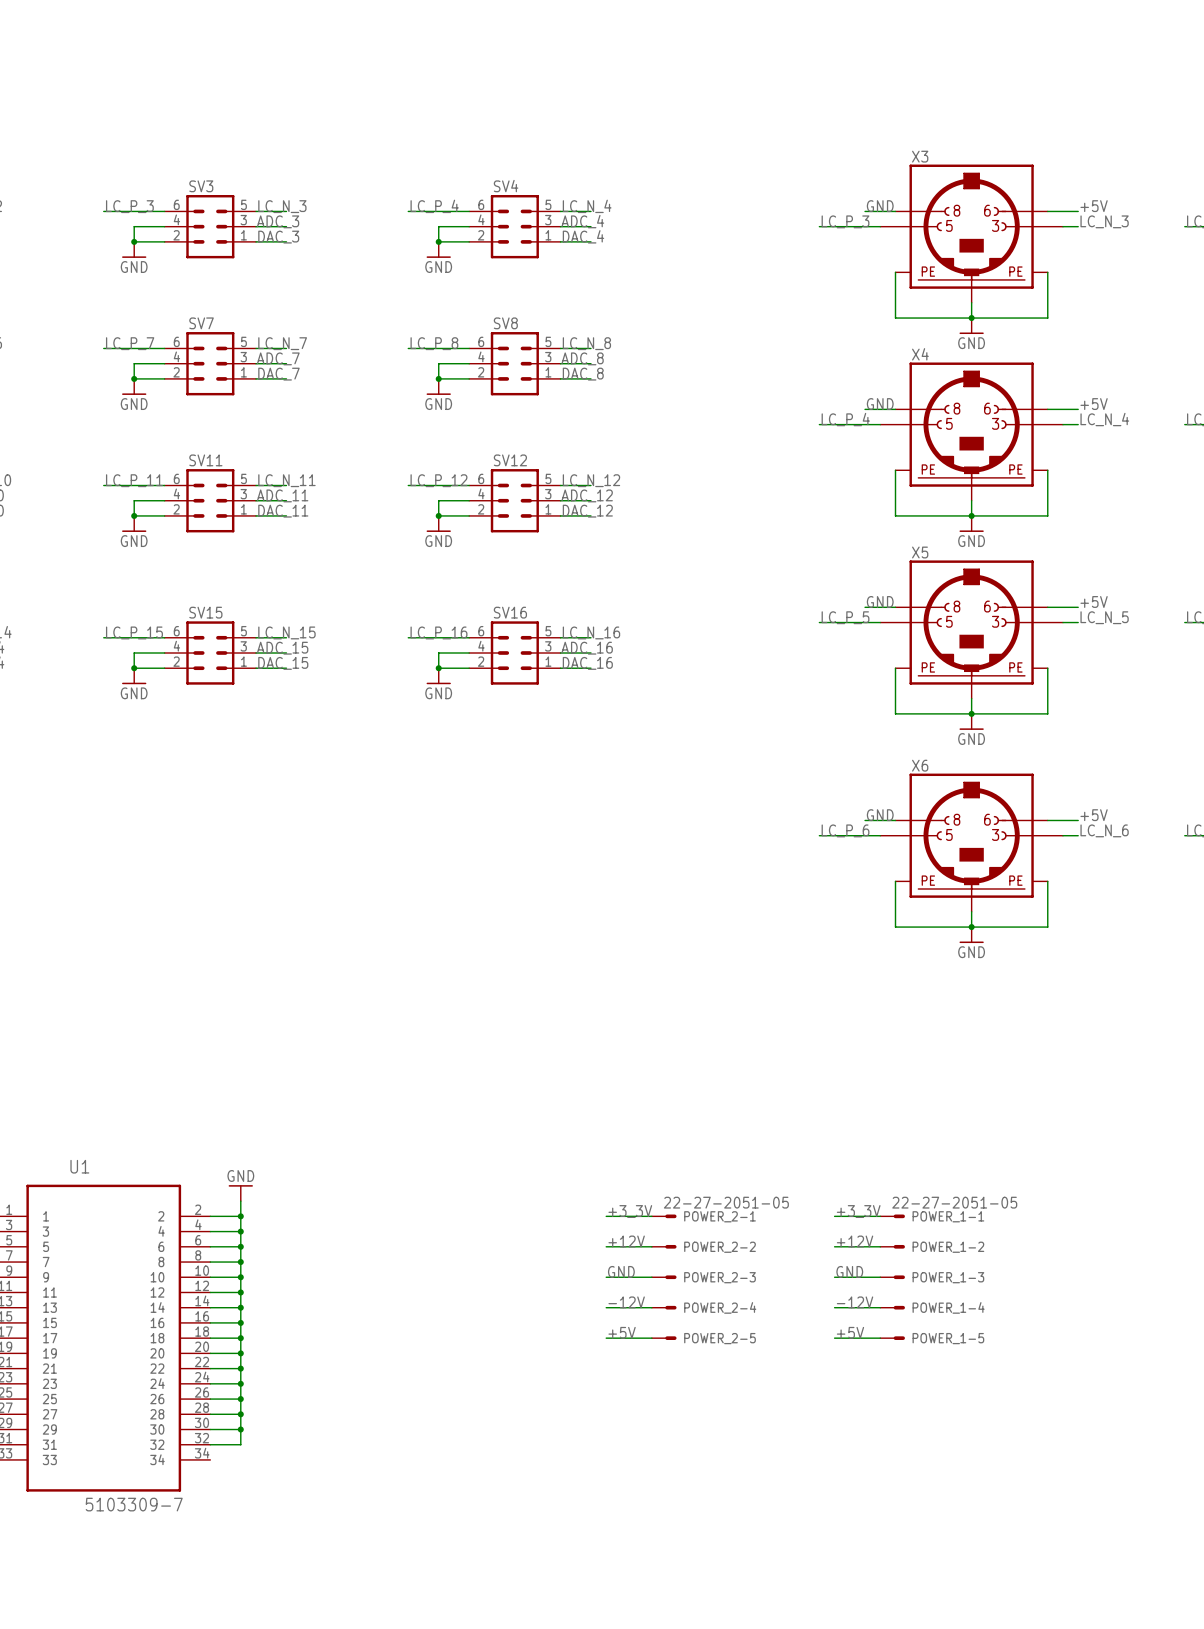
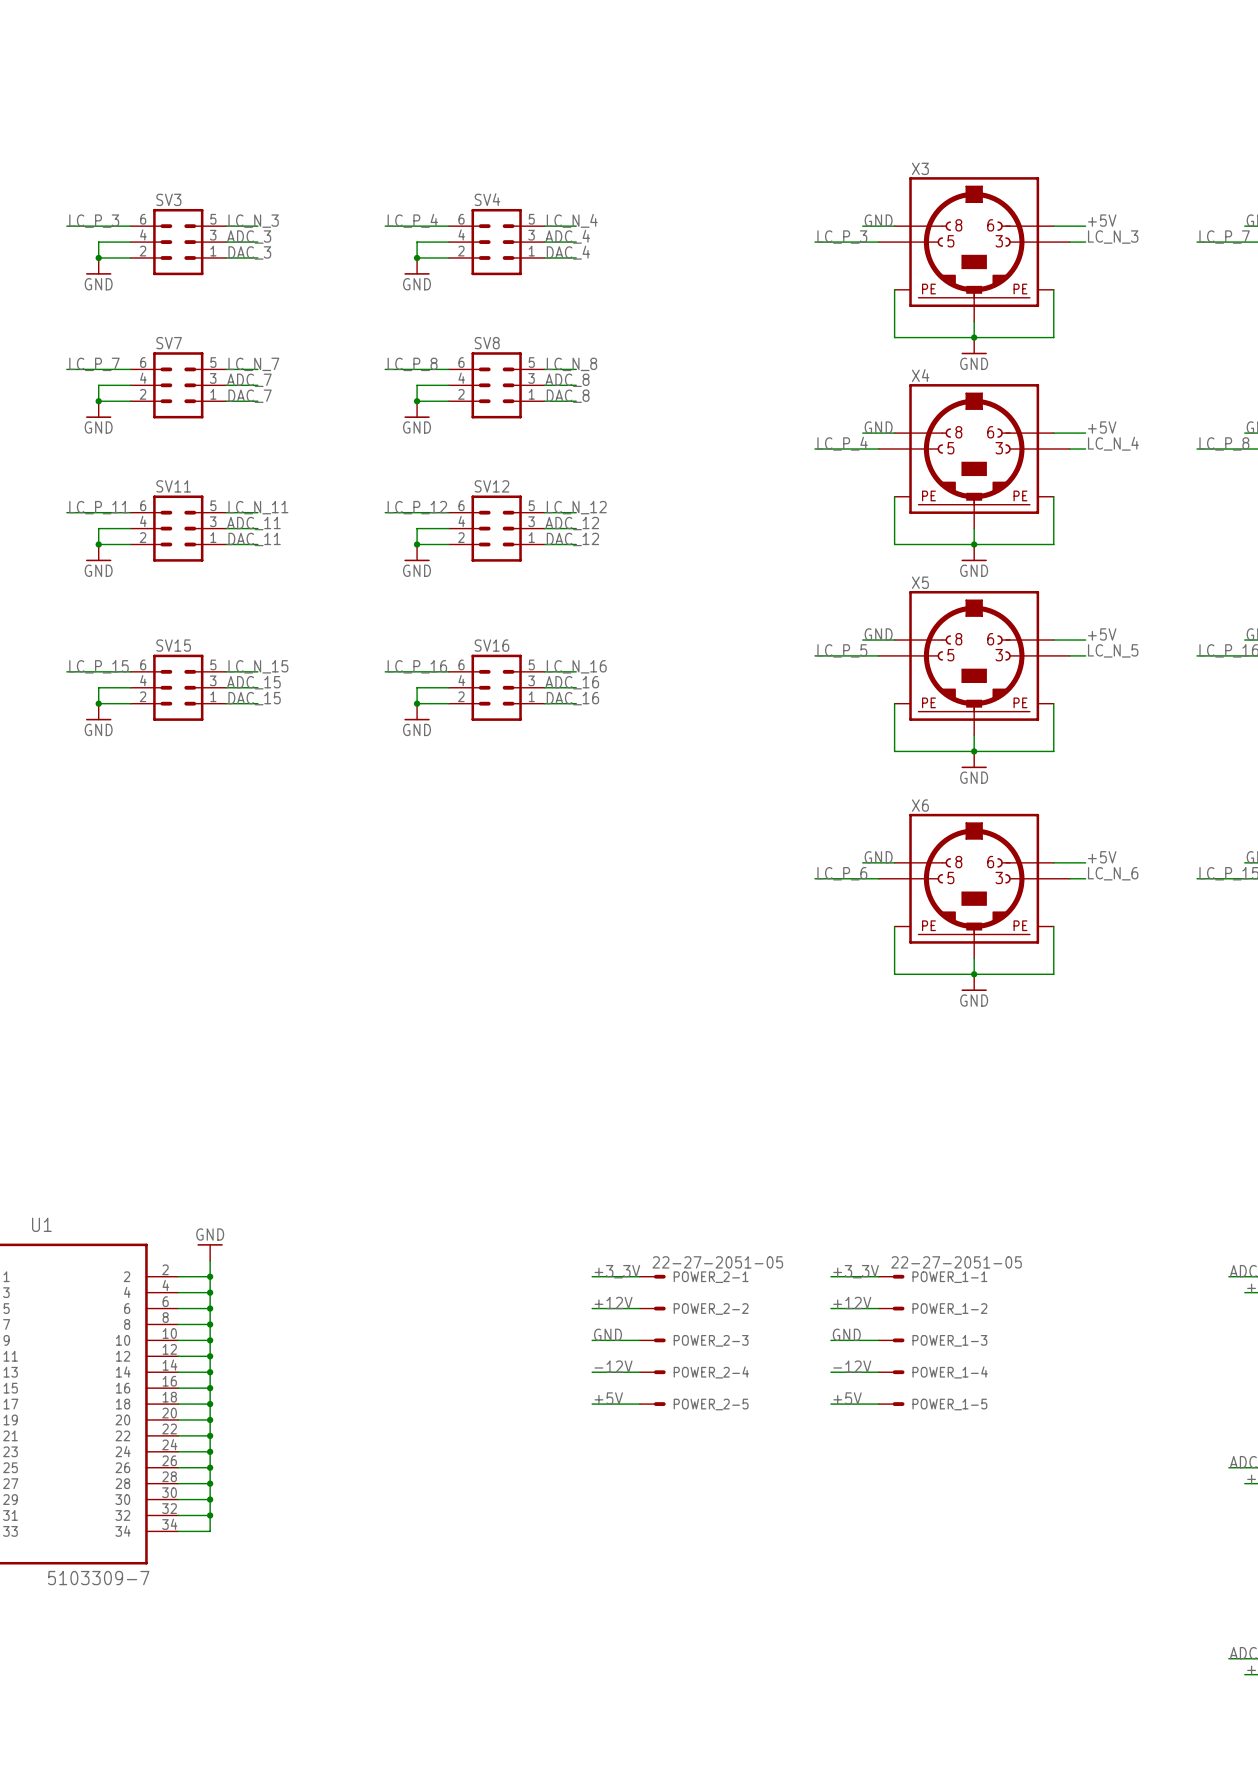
wire: none -> (210, 1515) (210, 1531) (178, 1531)
junction: none -> (210, 1515)

